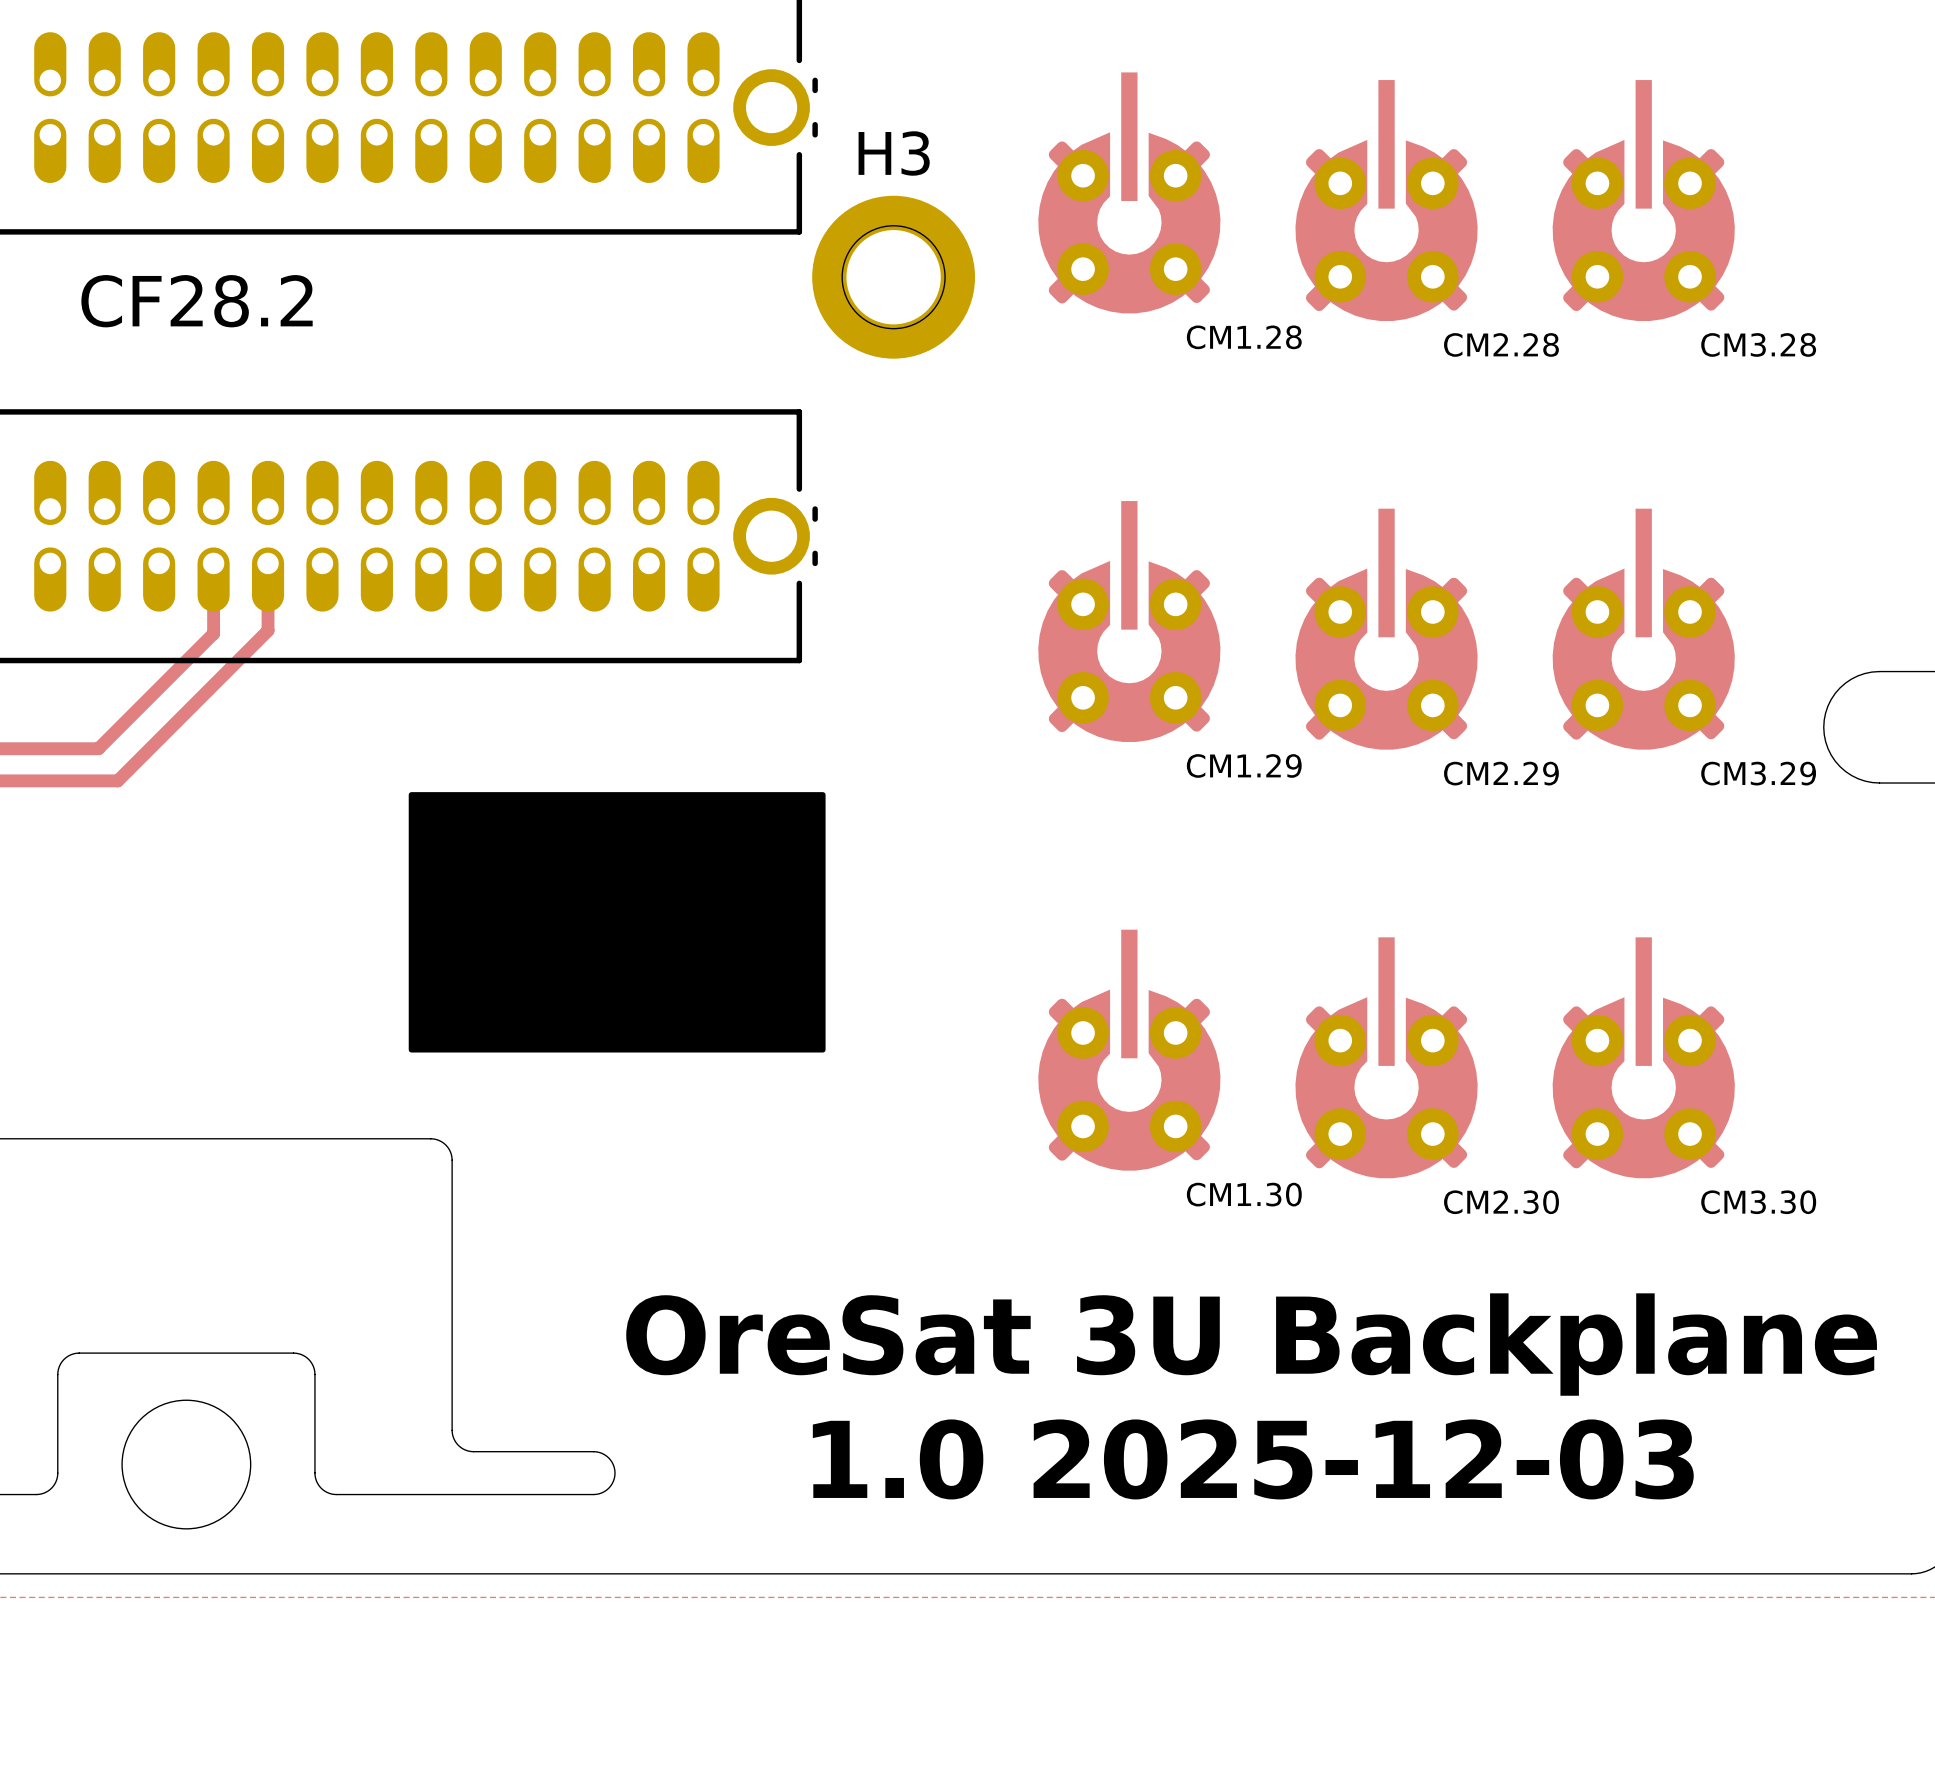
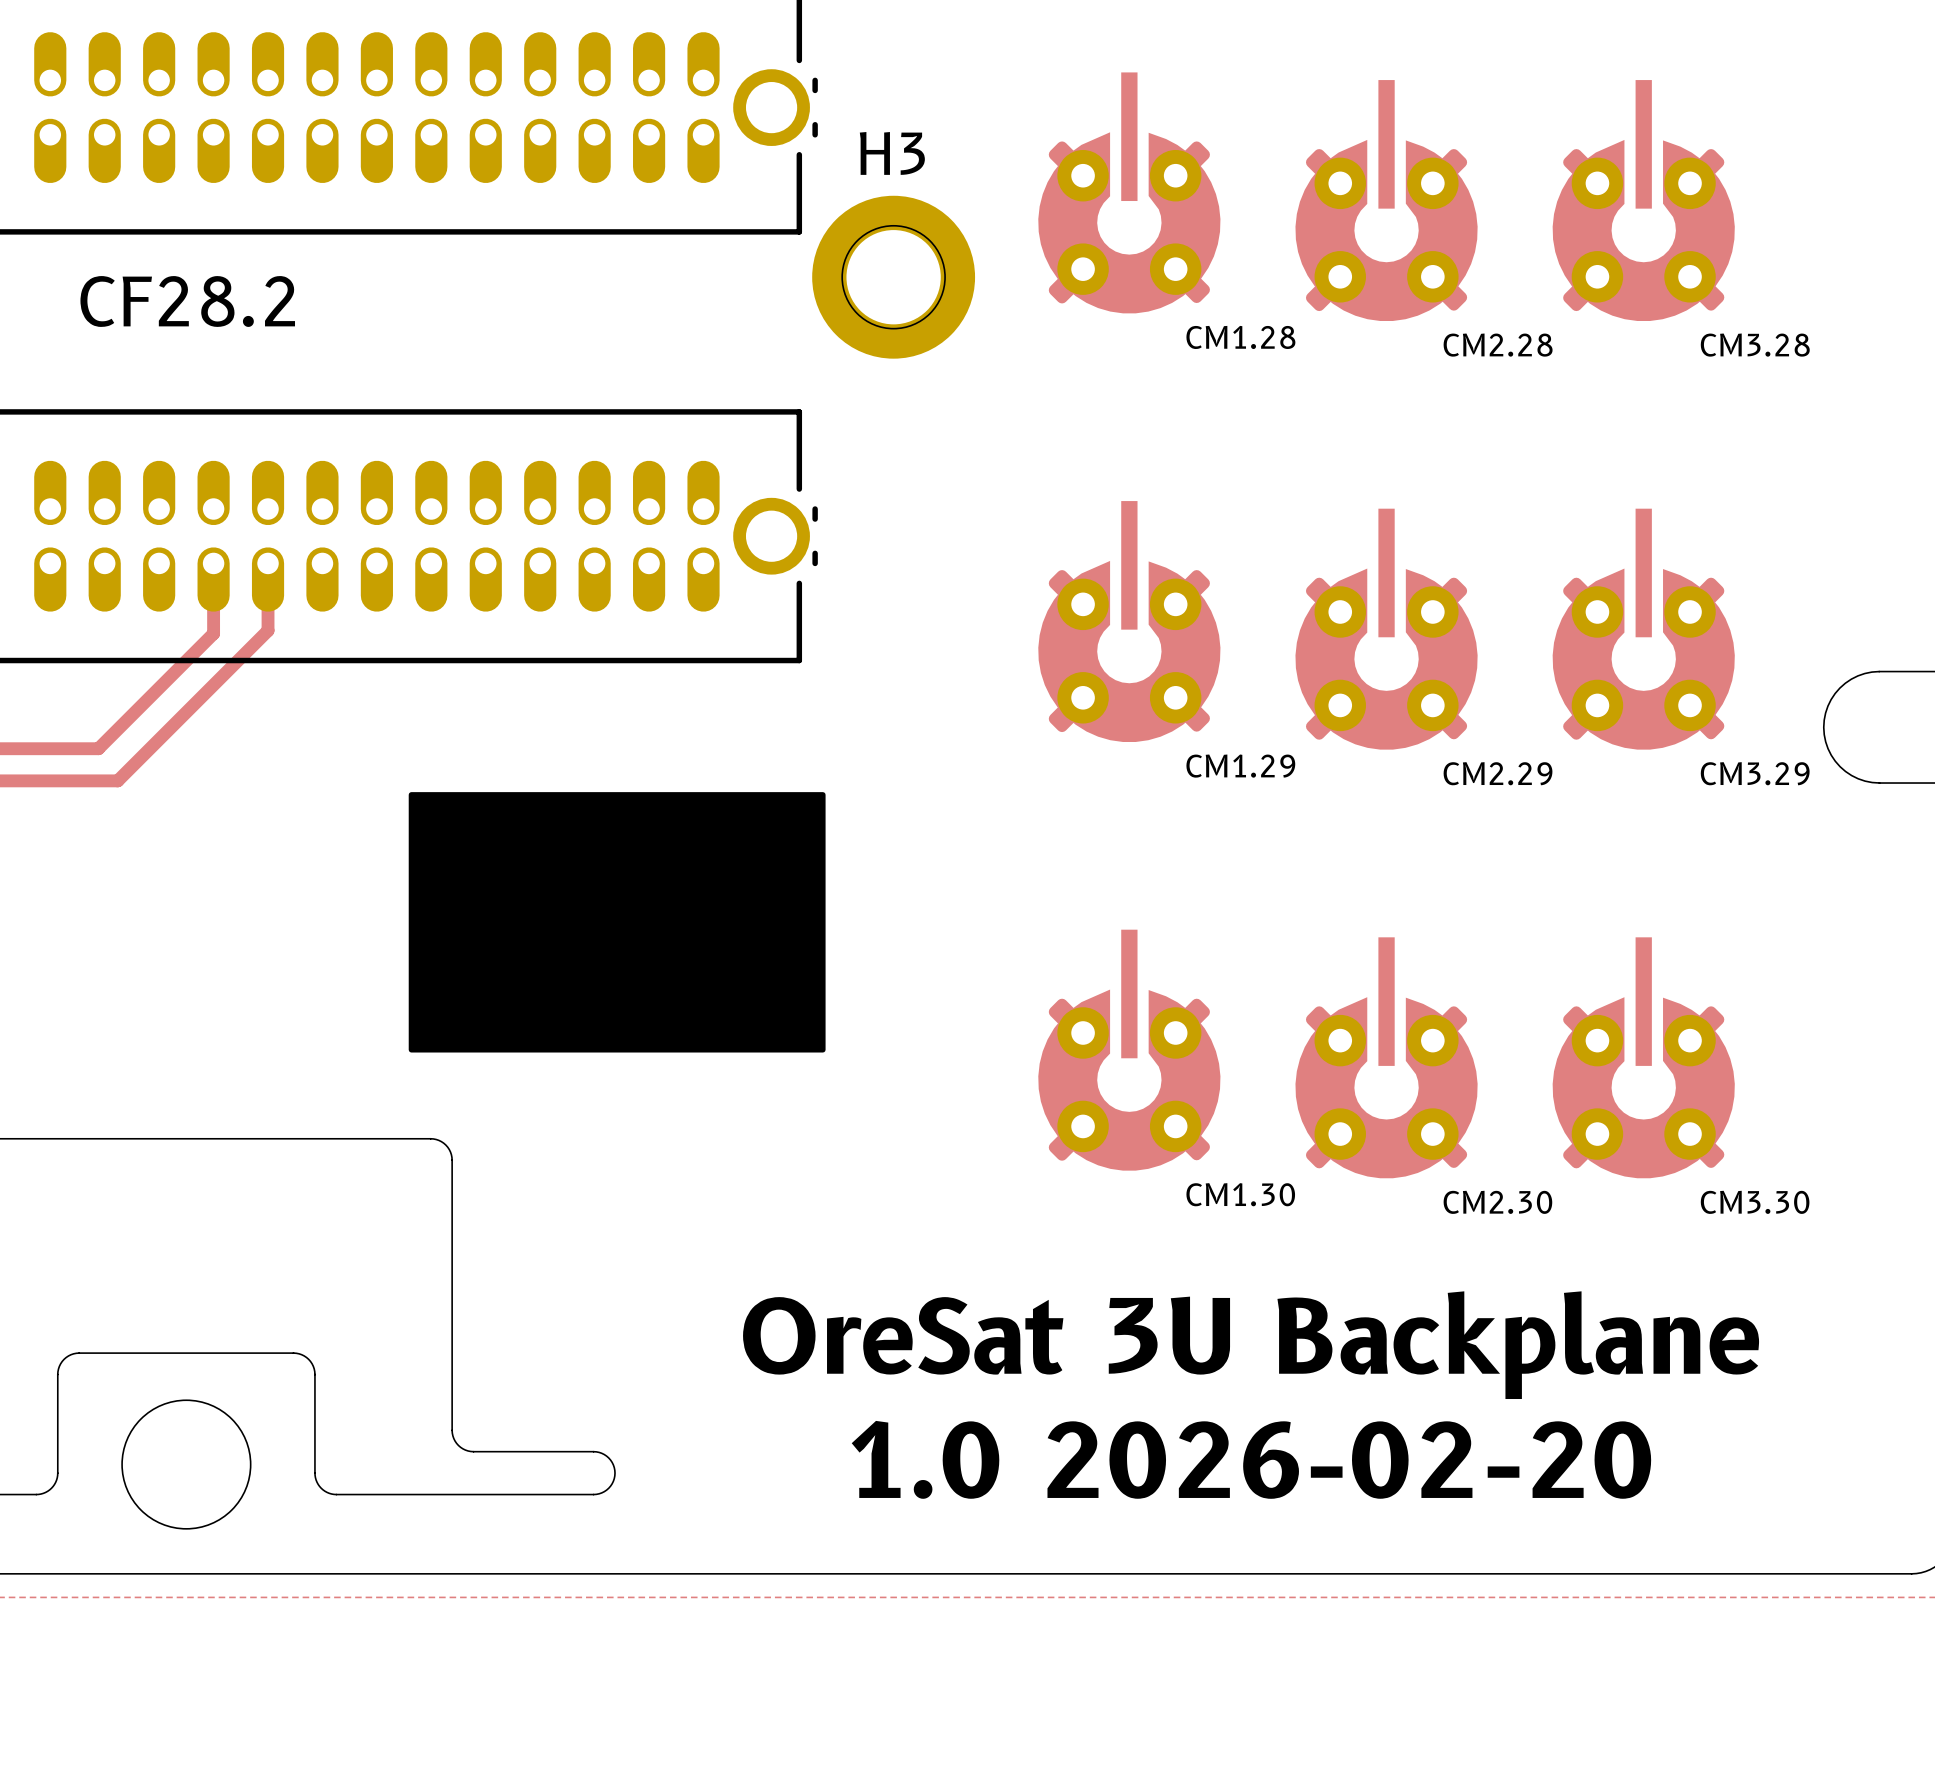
text: 1.0 2025-12-03 (1253, 1459) -> 1.0 2026-02-20 (1251, 1459)

